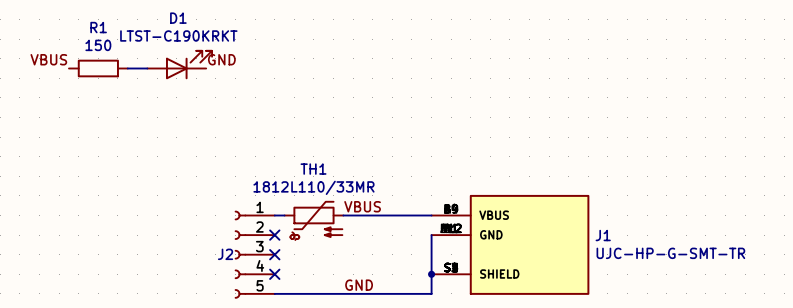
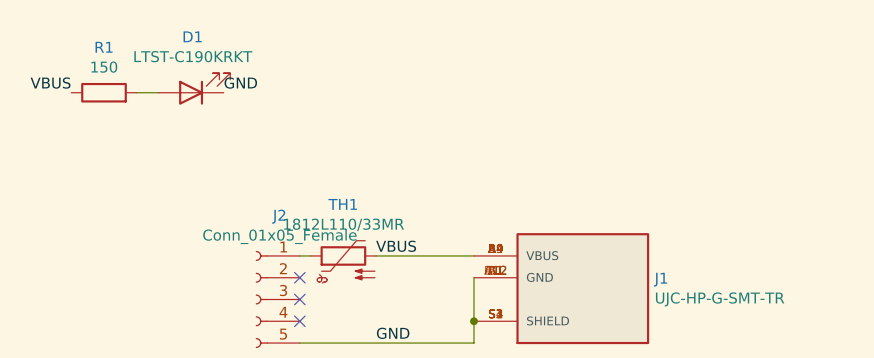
J2 value: none -> Conn_01x05_Female (279, 236)
J2 name position: J2 (225, 254) -> J2 (278, 216)

